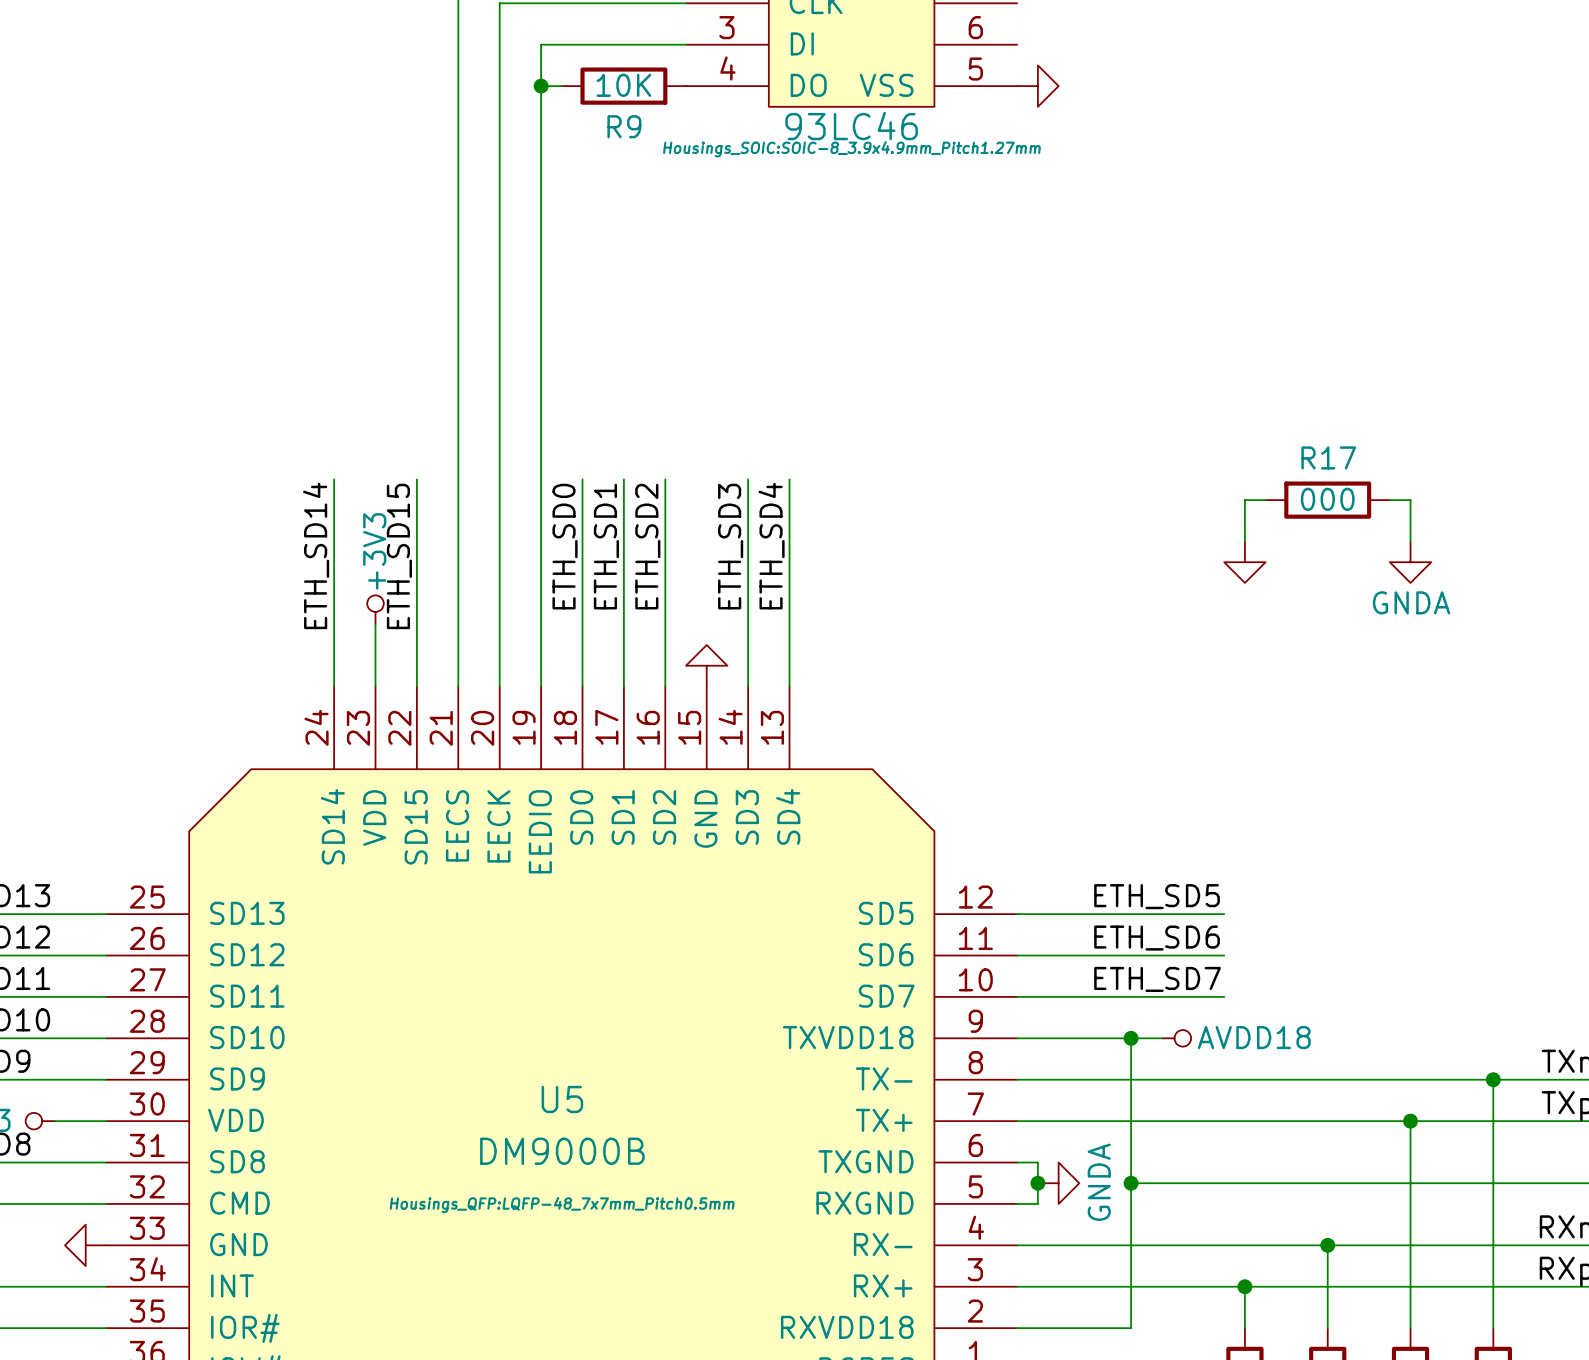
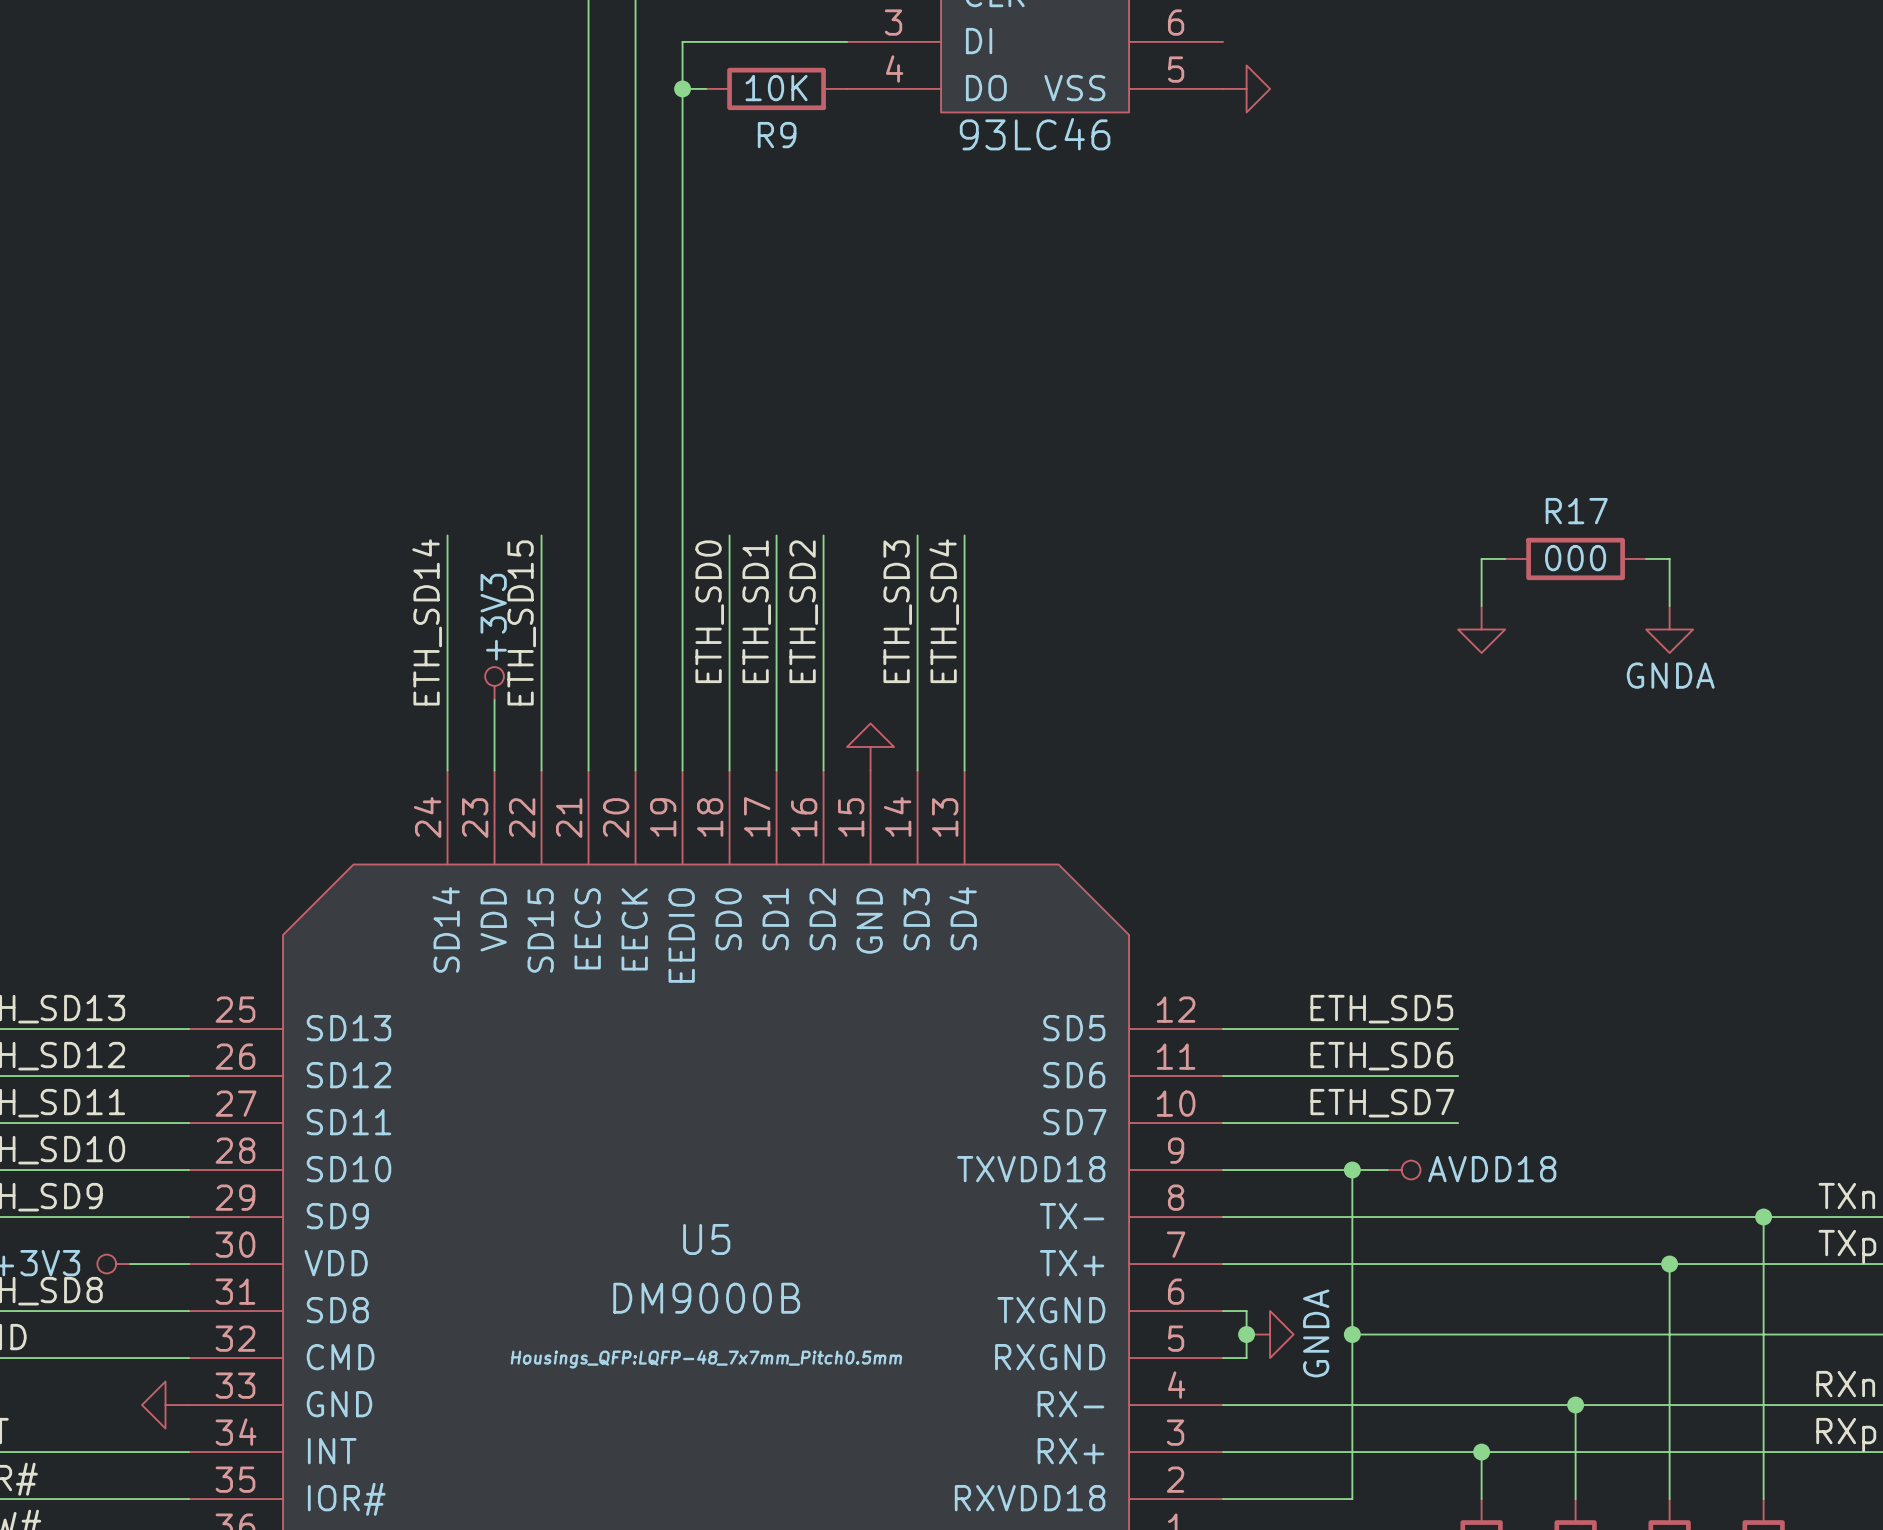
part text: Housings_SOIC:SOIC-8_3.9x4.9mm_Pitch1.27mm (851, 149) -> none

